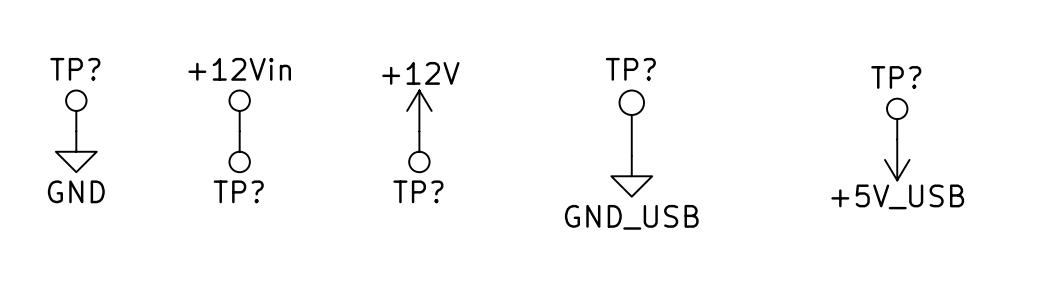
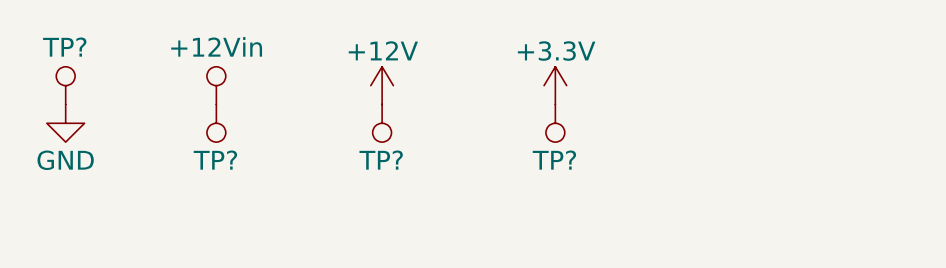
power symbol: none -> +3.3V (555, 85)
TP? rotation: 0° (897, 119) -> 180° (555, 123)
TP? position: (897, 119) -> (555, 123)
TP?: (631, 123) -> none
power symbol: +5V_USB (897, 159) -> none
power symbol: GND_USB (631, 176) -> none

